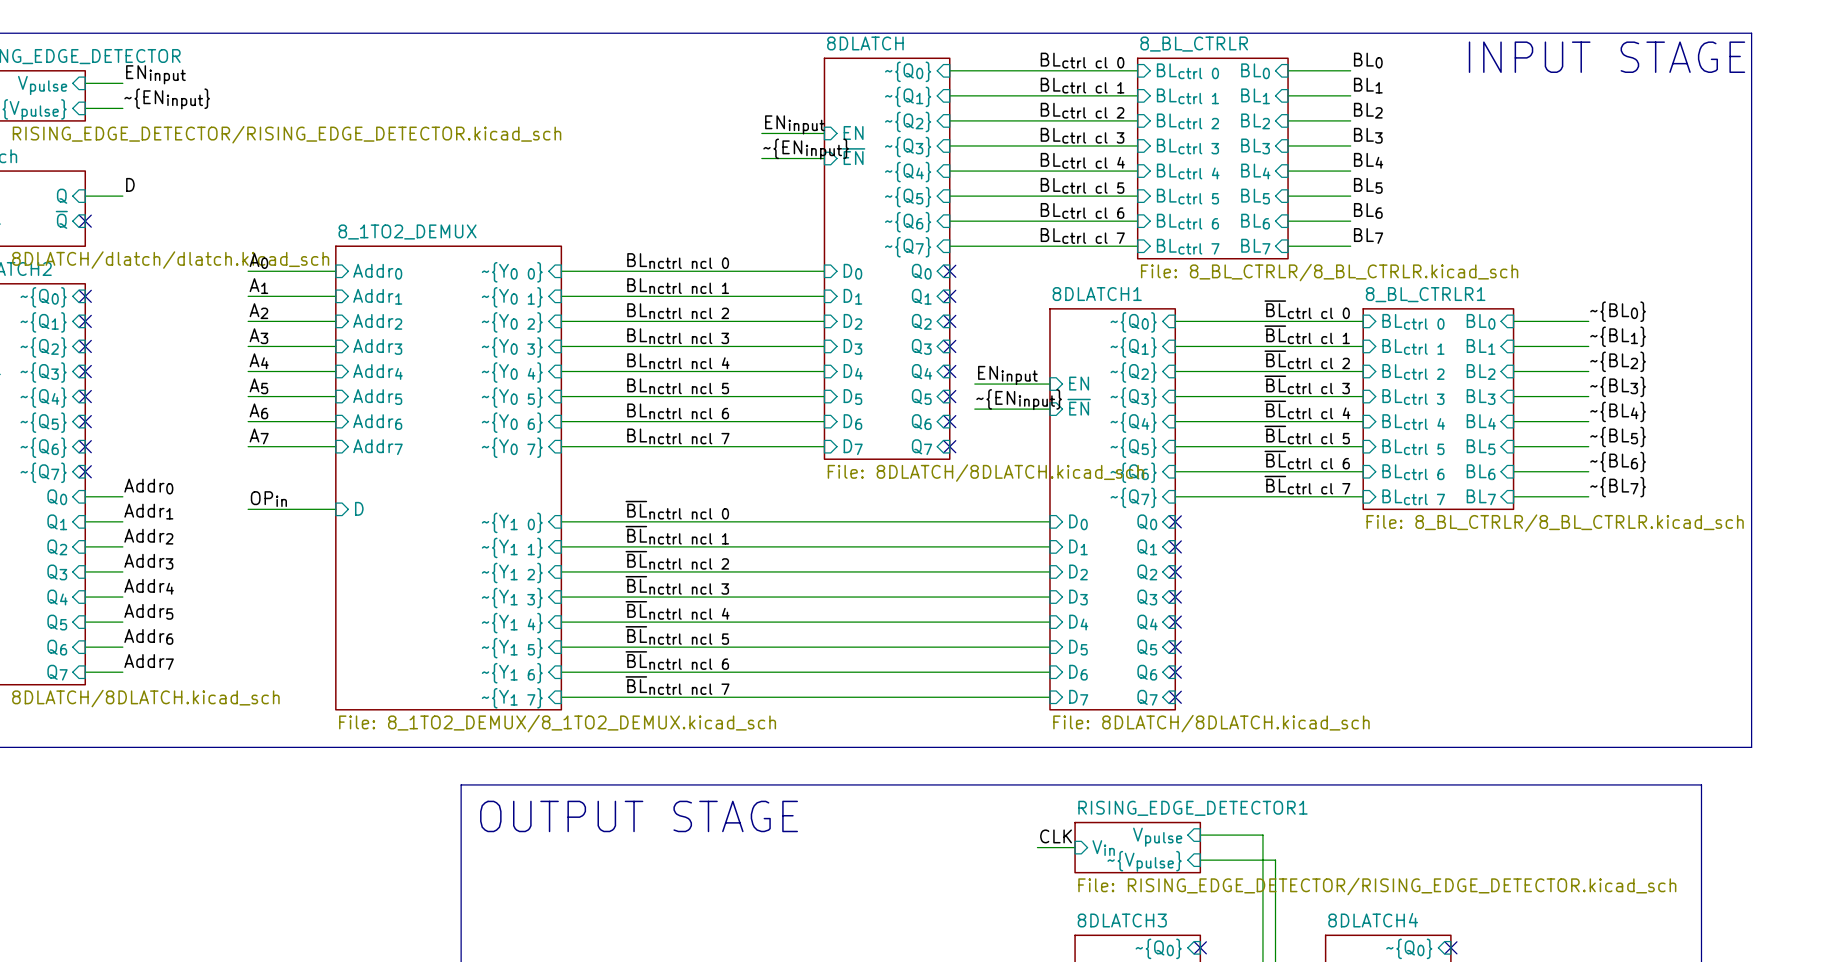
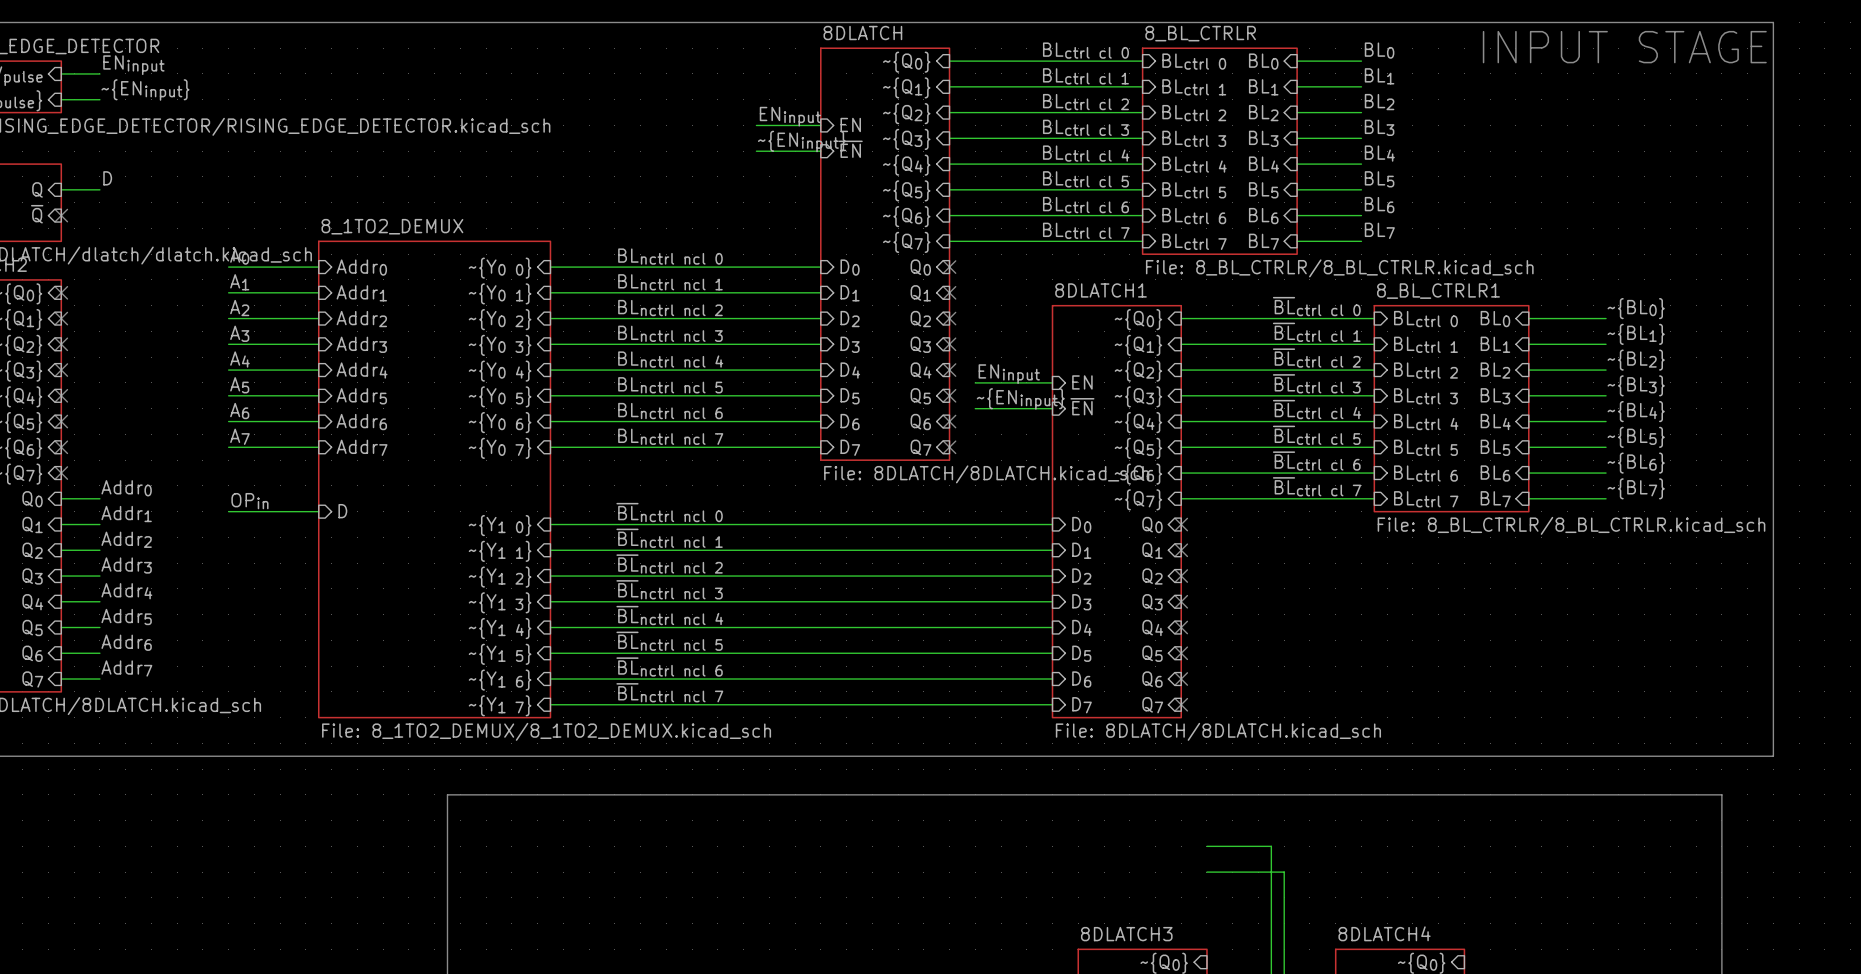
text: OUTPUT STAGE (639, 816) -> none
label: CLK (1056, 836) -> none
sheet pin: Vpulse (1157, 837) -> none
wire: (1037, 847) (1075, 847) -> none
sheet RISING_EDGE_DETECTOR1: File: RISING_EDGE_DETECTOR/RISING_EDGE_DETECTOR.kicad_sch (1137, 847) -> none
sheet pin: Vin (1103, 848) -> none
sheet pin: ~{Vpulse} (1144, 861) -> none
no-connect mark: (1200, 947) -> none
no-connect mark: (1450, 947) -> none

